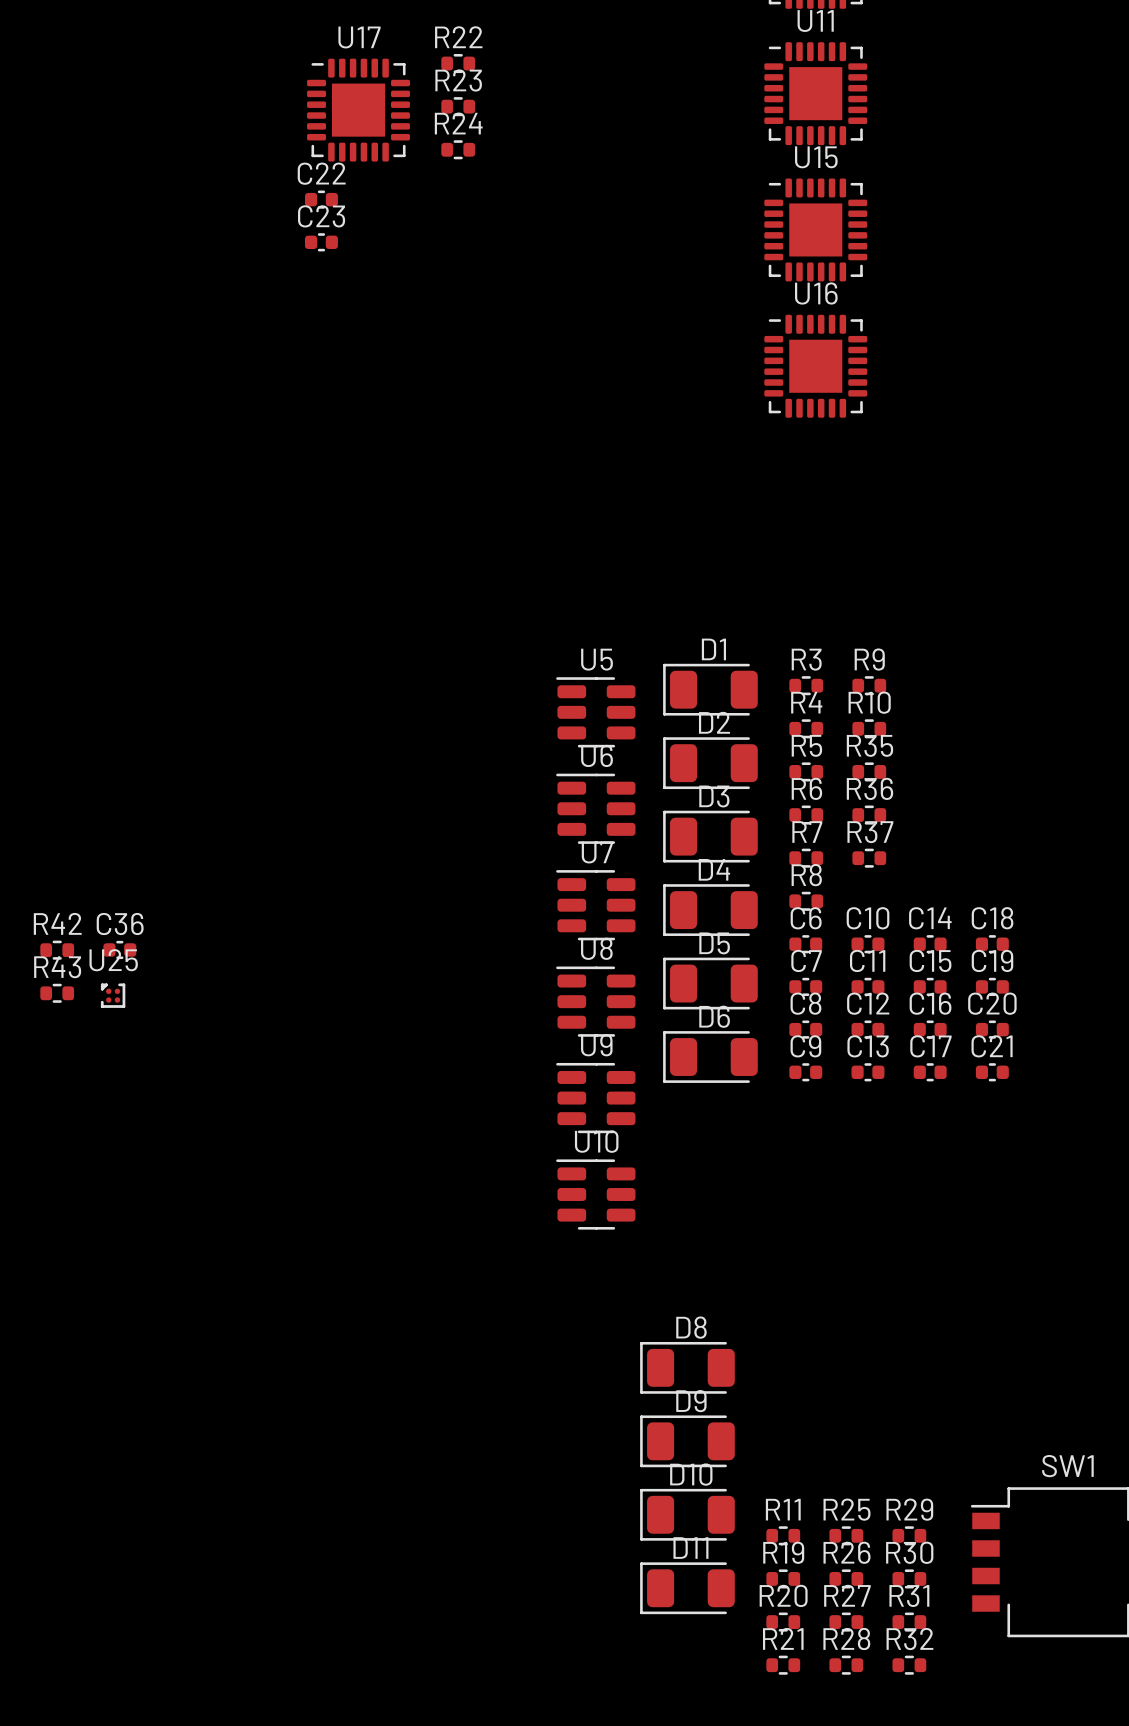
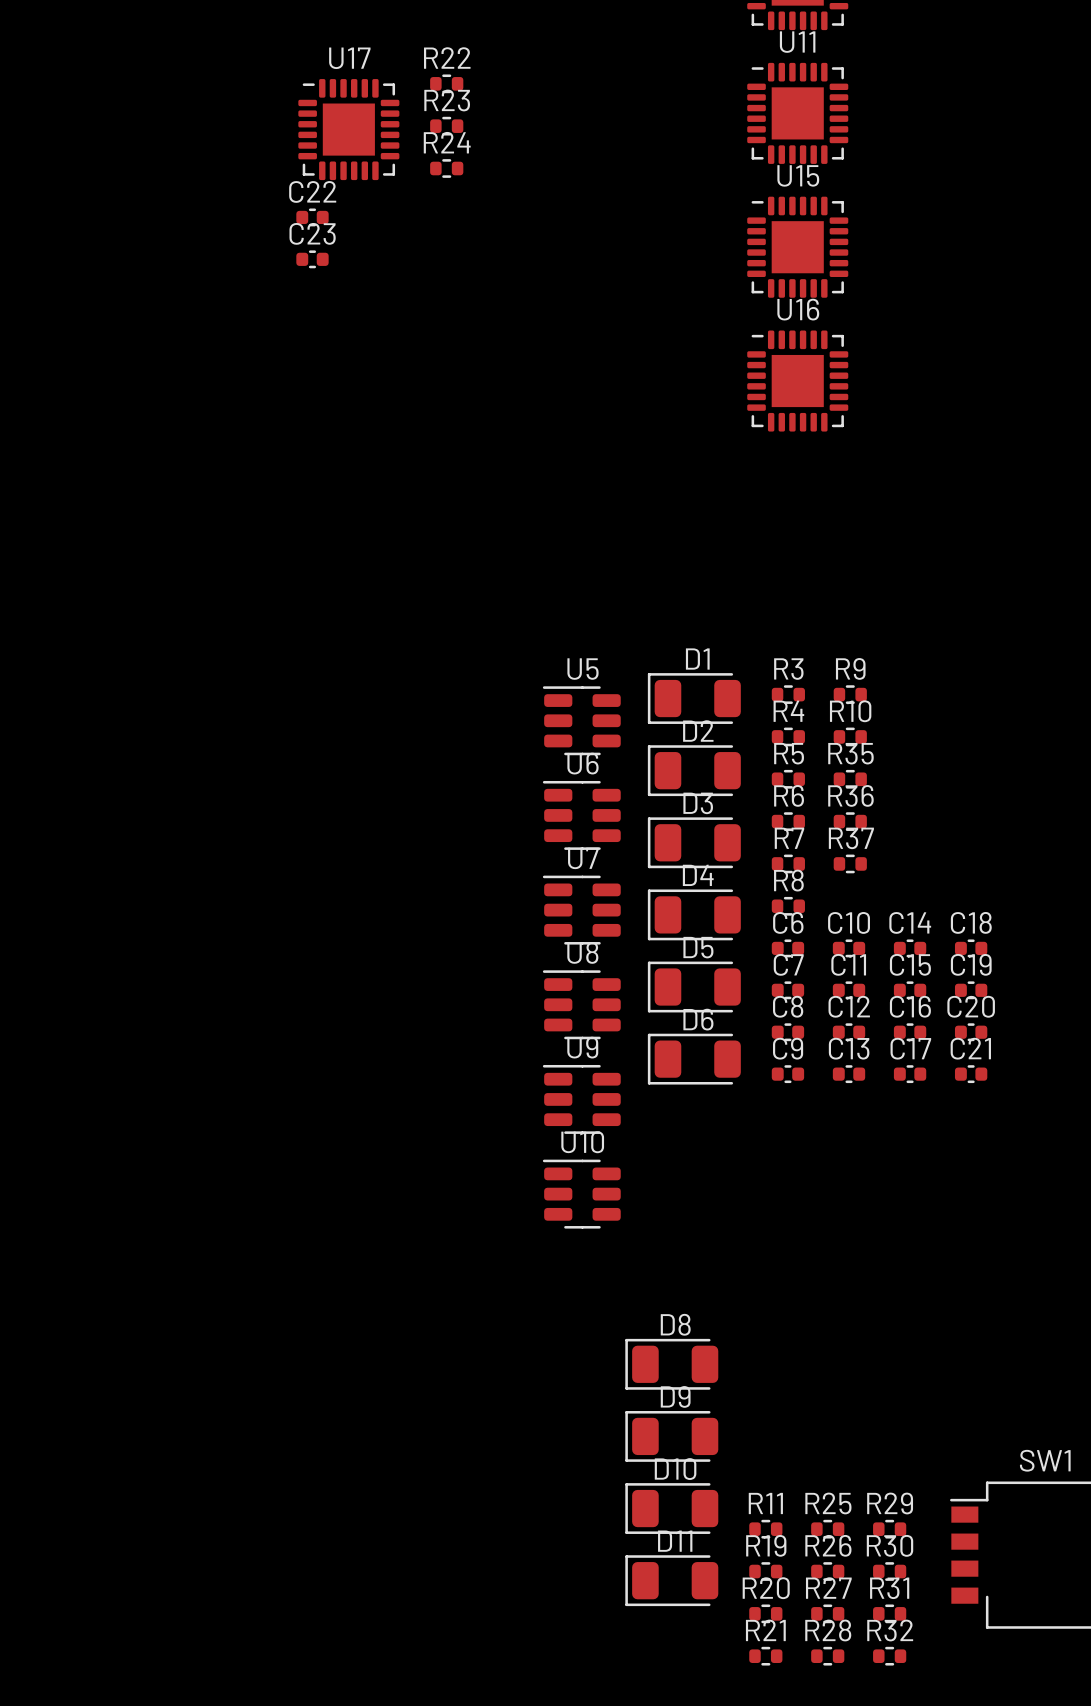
C36: (119, 949) -> none
R42: (57, 950) -> none
R43: (57, 993) -> none
U25: (113, 995) -> none

